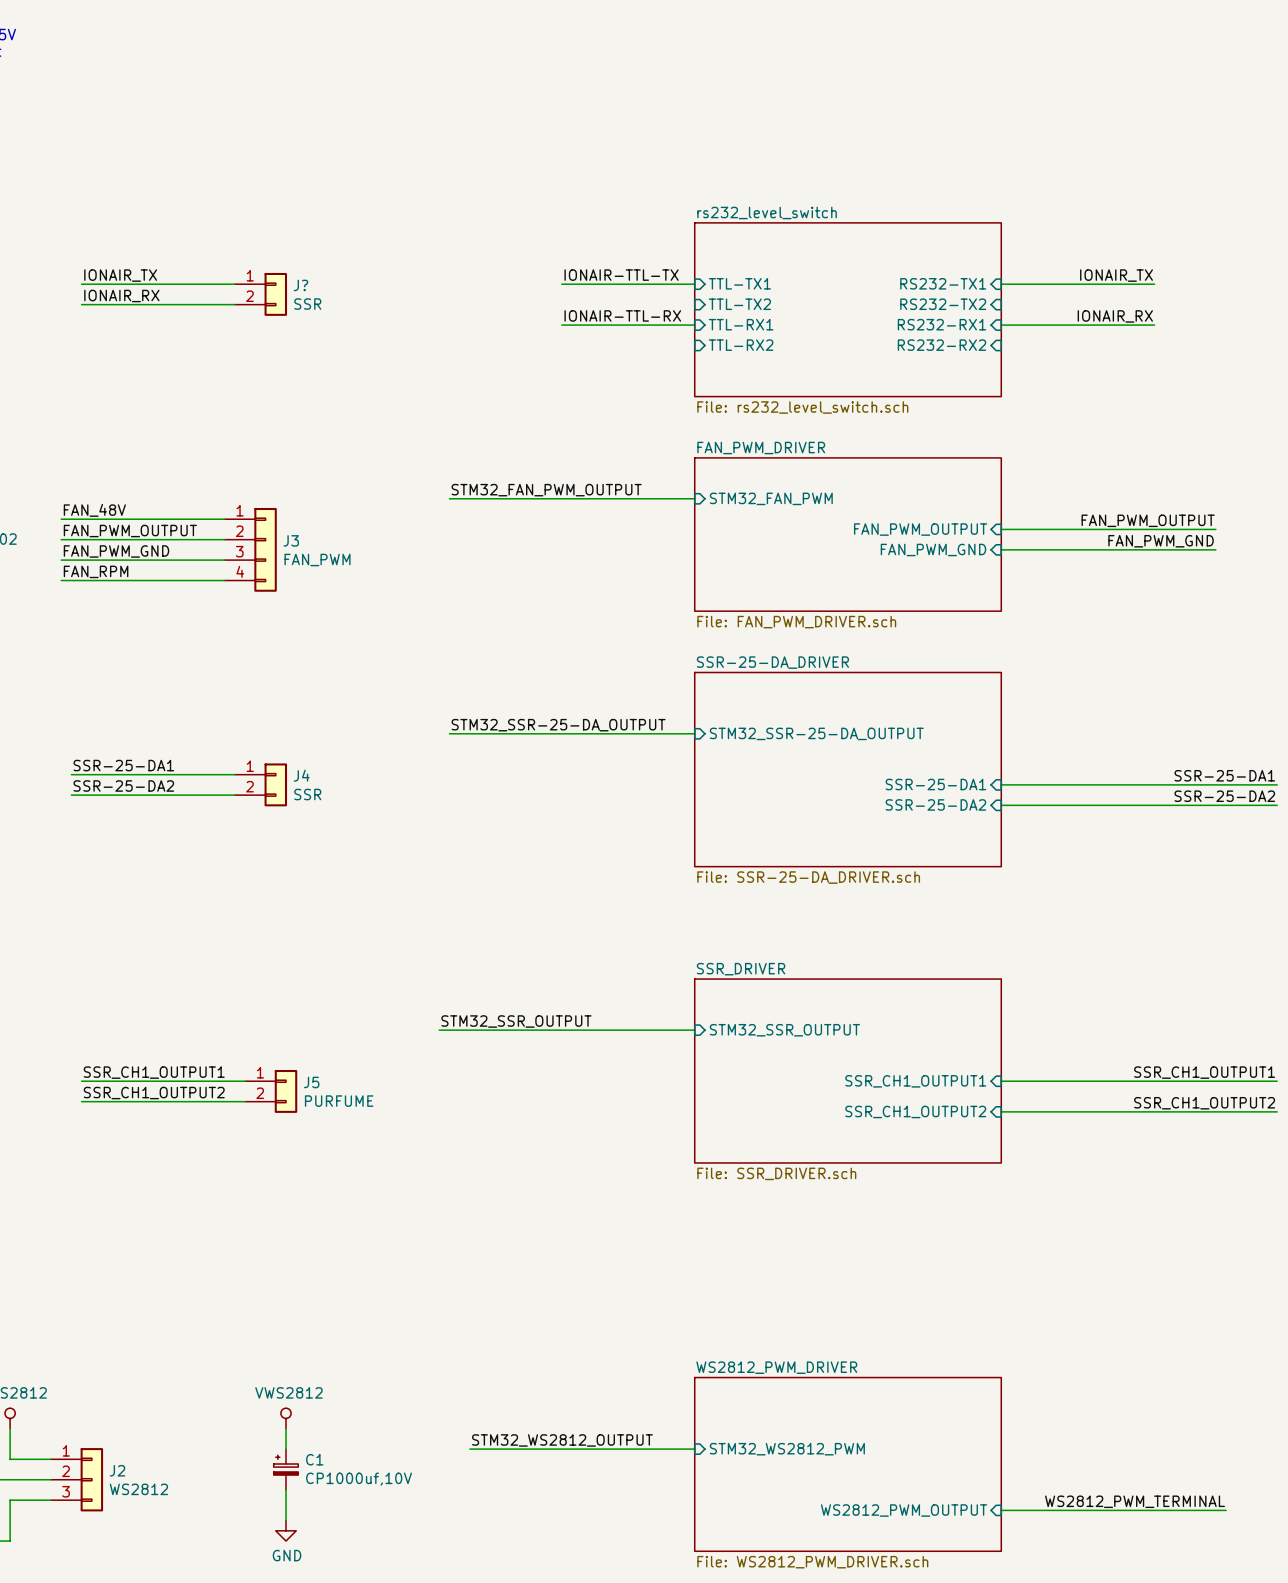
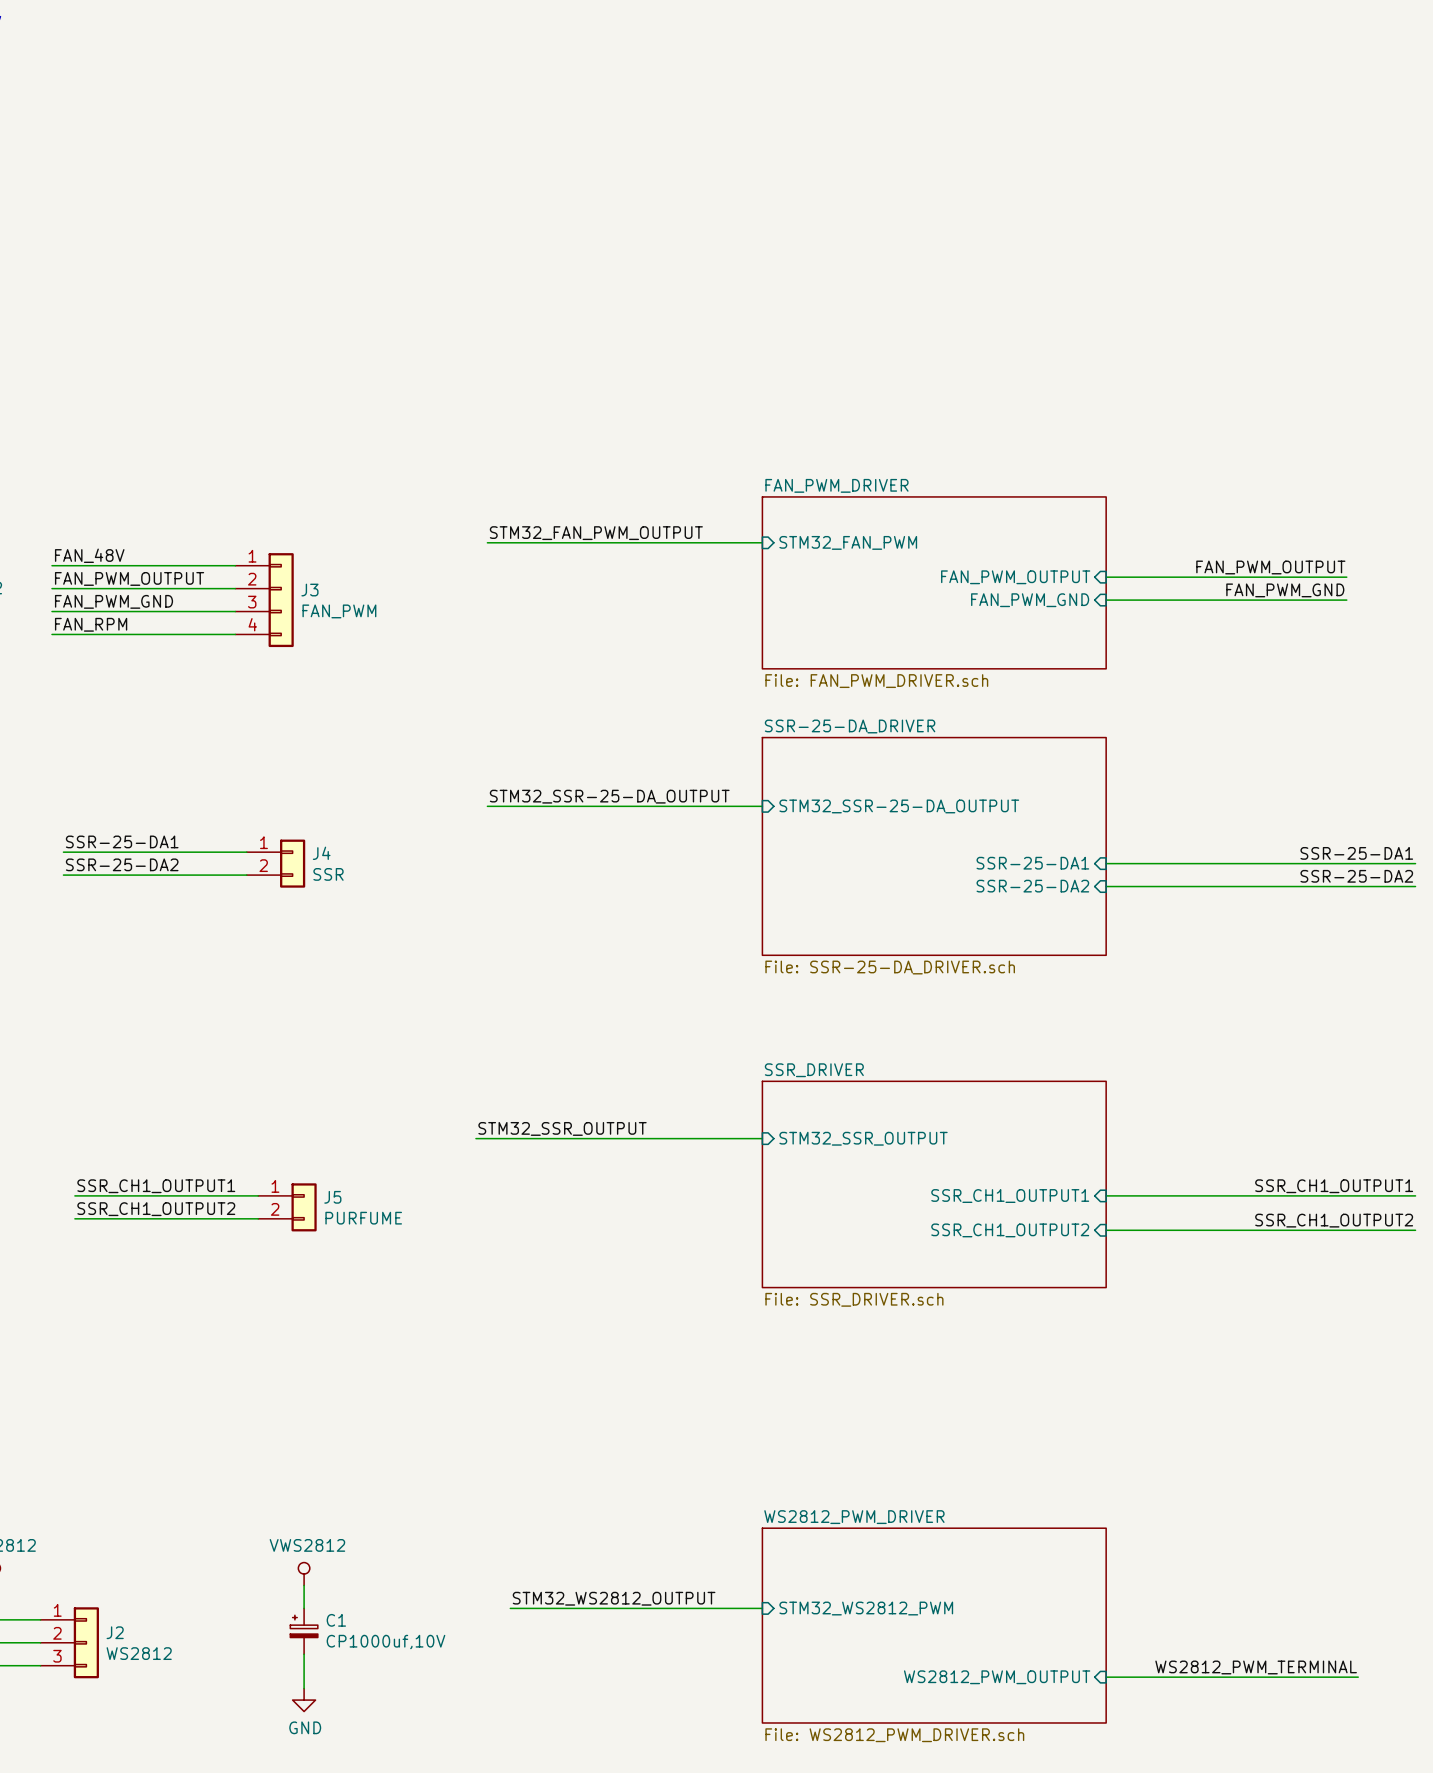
label: IONAIR_TX (120, 275) -> none
label: IONAIR-TTL-TX (621, 275) -> none
label: IONAIR_TX (1116, 275) -> none
sheet pin: TTL-TX1 (739, 283) -> none
sheet pin: RS232-TX1 (943, 283) -> none
wire: (81, 284) (234, 284) -> none
wire: (561, 284) (694, 284) -> none
wire: (1001, 284) (1154, 284) -> none
J?: SSR (260, 294) -> none
label: IONAIR_RX (121, 296) -> none
wire: (81, 304) (234, 304) -> none
sheet pin: TTL-TX2 (739, 304) -> none
sheet pin: RS232-TX2 (943, 304) -> none
sheet rs232_level_switch: File: rs232_level_switch.sch (848, 309) -> none
label: IONAIR-TTL-RX (622, 315) -> none
label: IONAIR_RX (1115, 316) -> none
sheet pin: TTL-RX1 (741, 324) -> none
sheet pin: RS232-RX1 (942, 324) -> none
wire: (561, 325) (694, 325) -> none
wire: (1001, 325) (1154, 325) -> none
sheet pin: TTL-RX2 (741, 345) -> none
sheet pin: RS232-RX2 (942, 345) -> none

